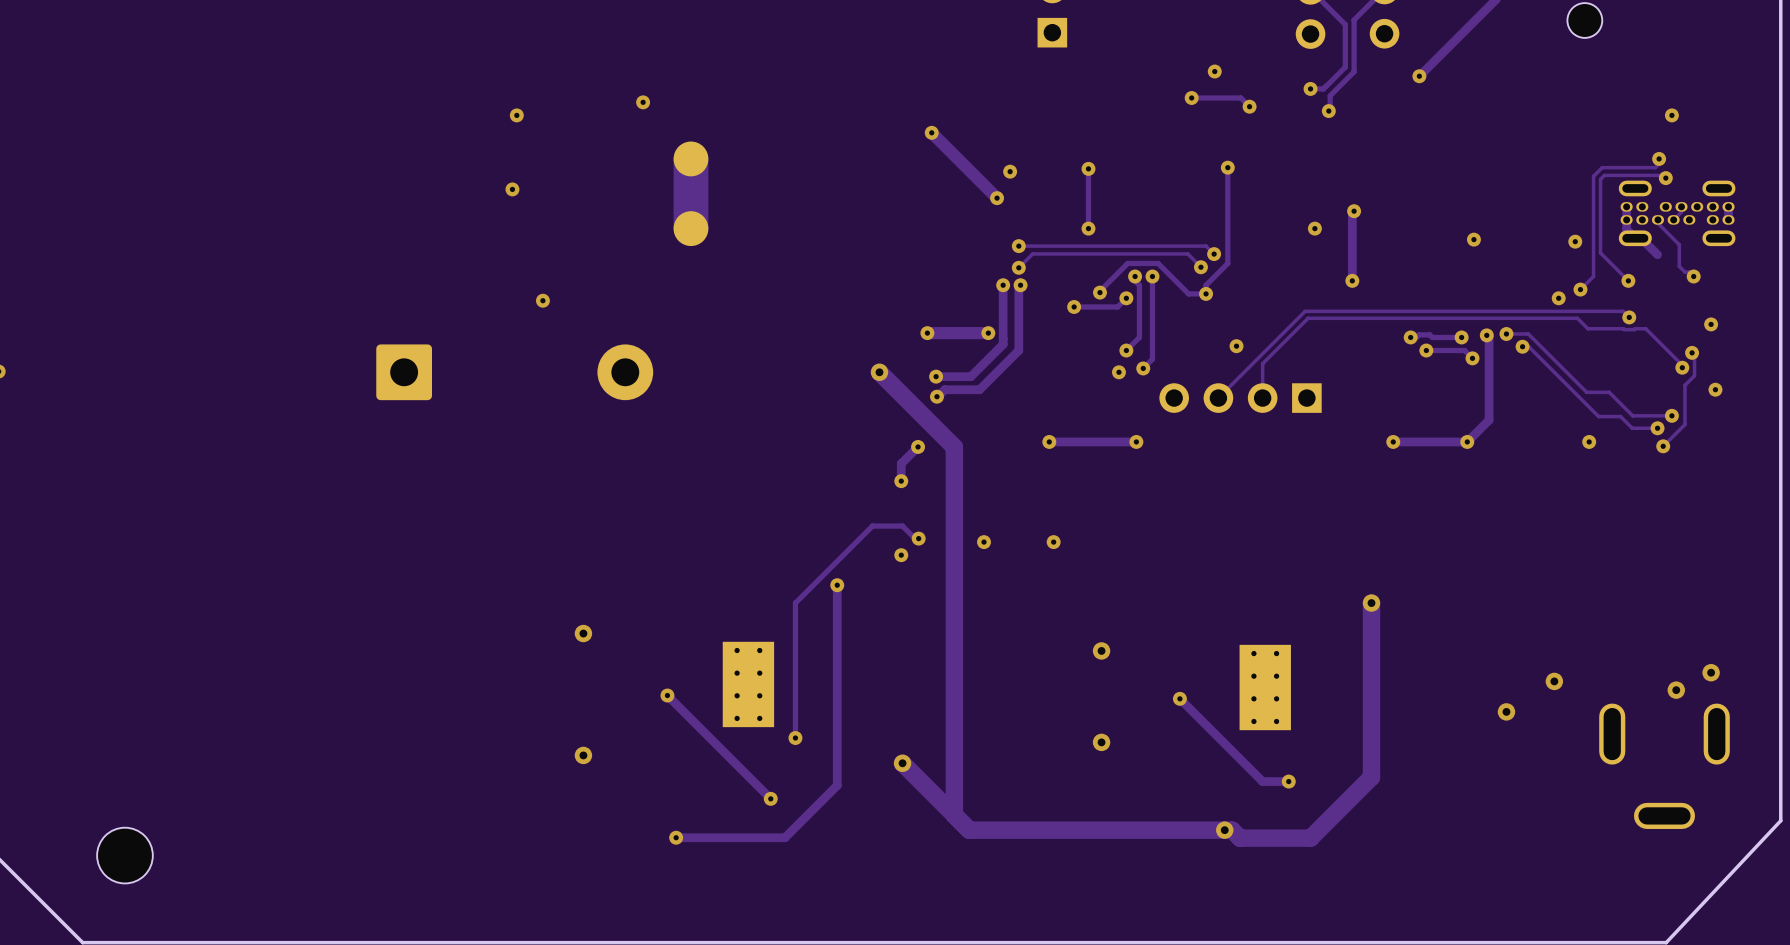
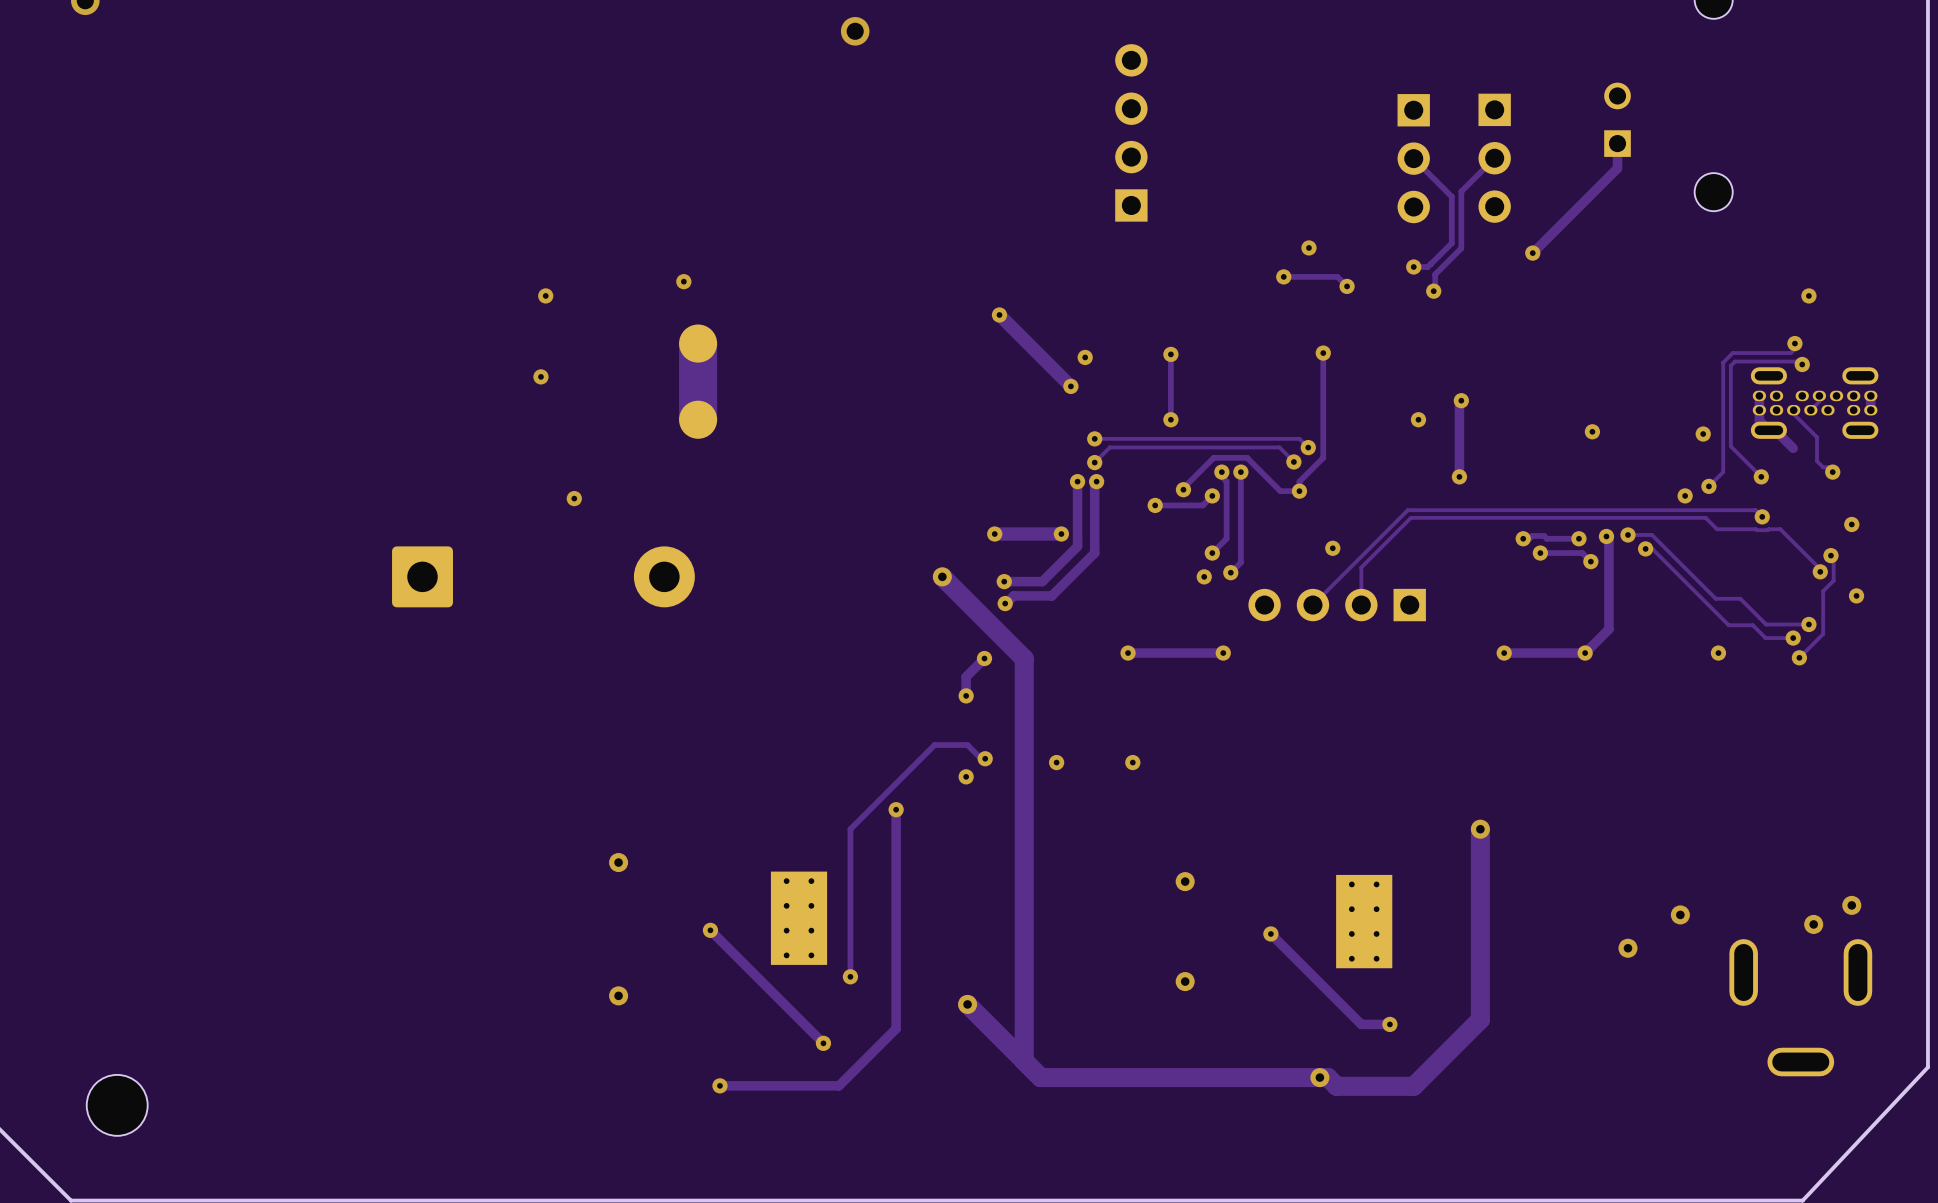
part position: (690, 193) -> (698, 381)

